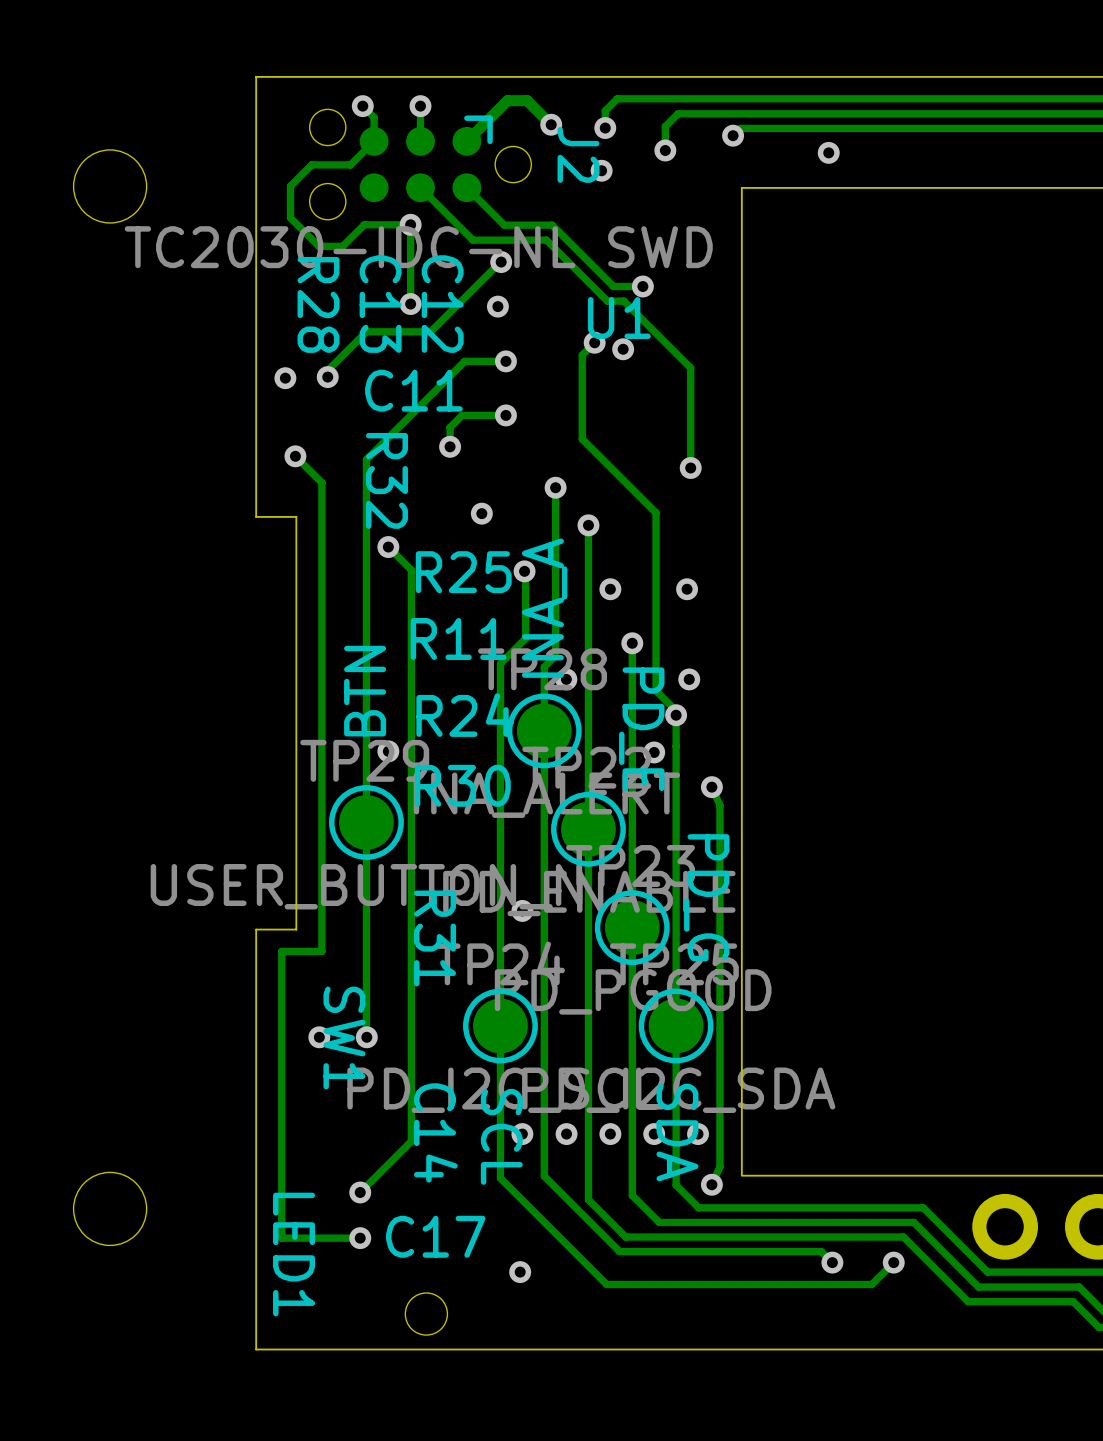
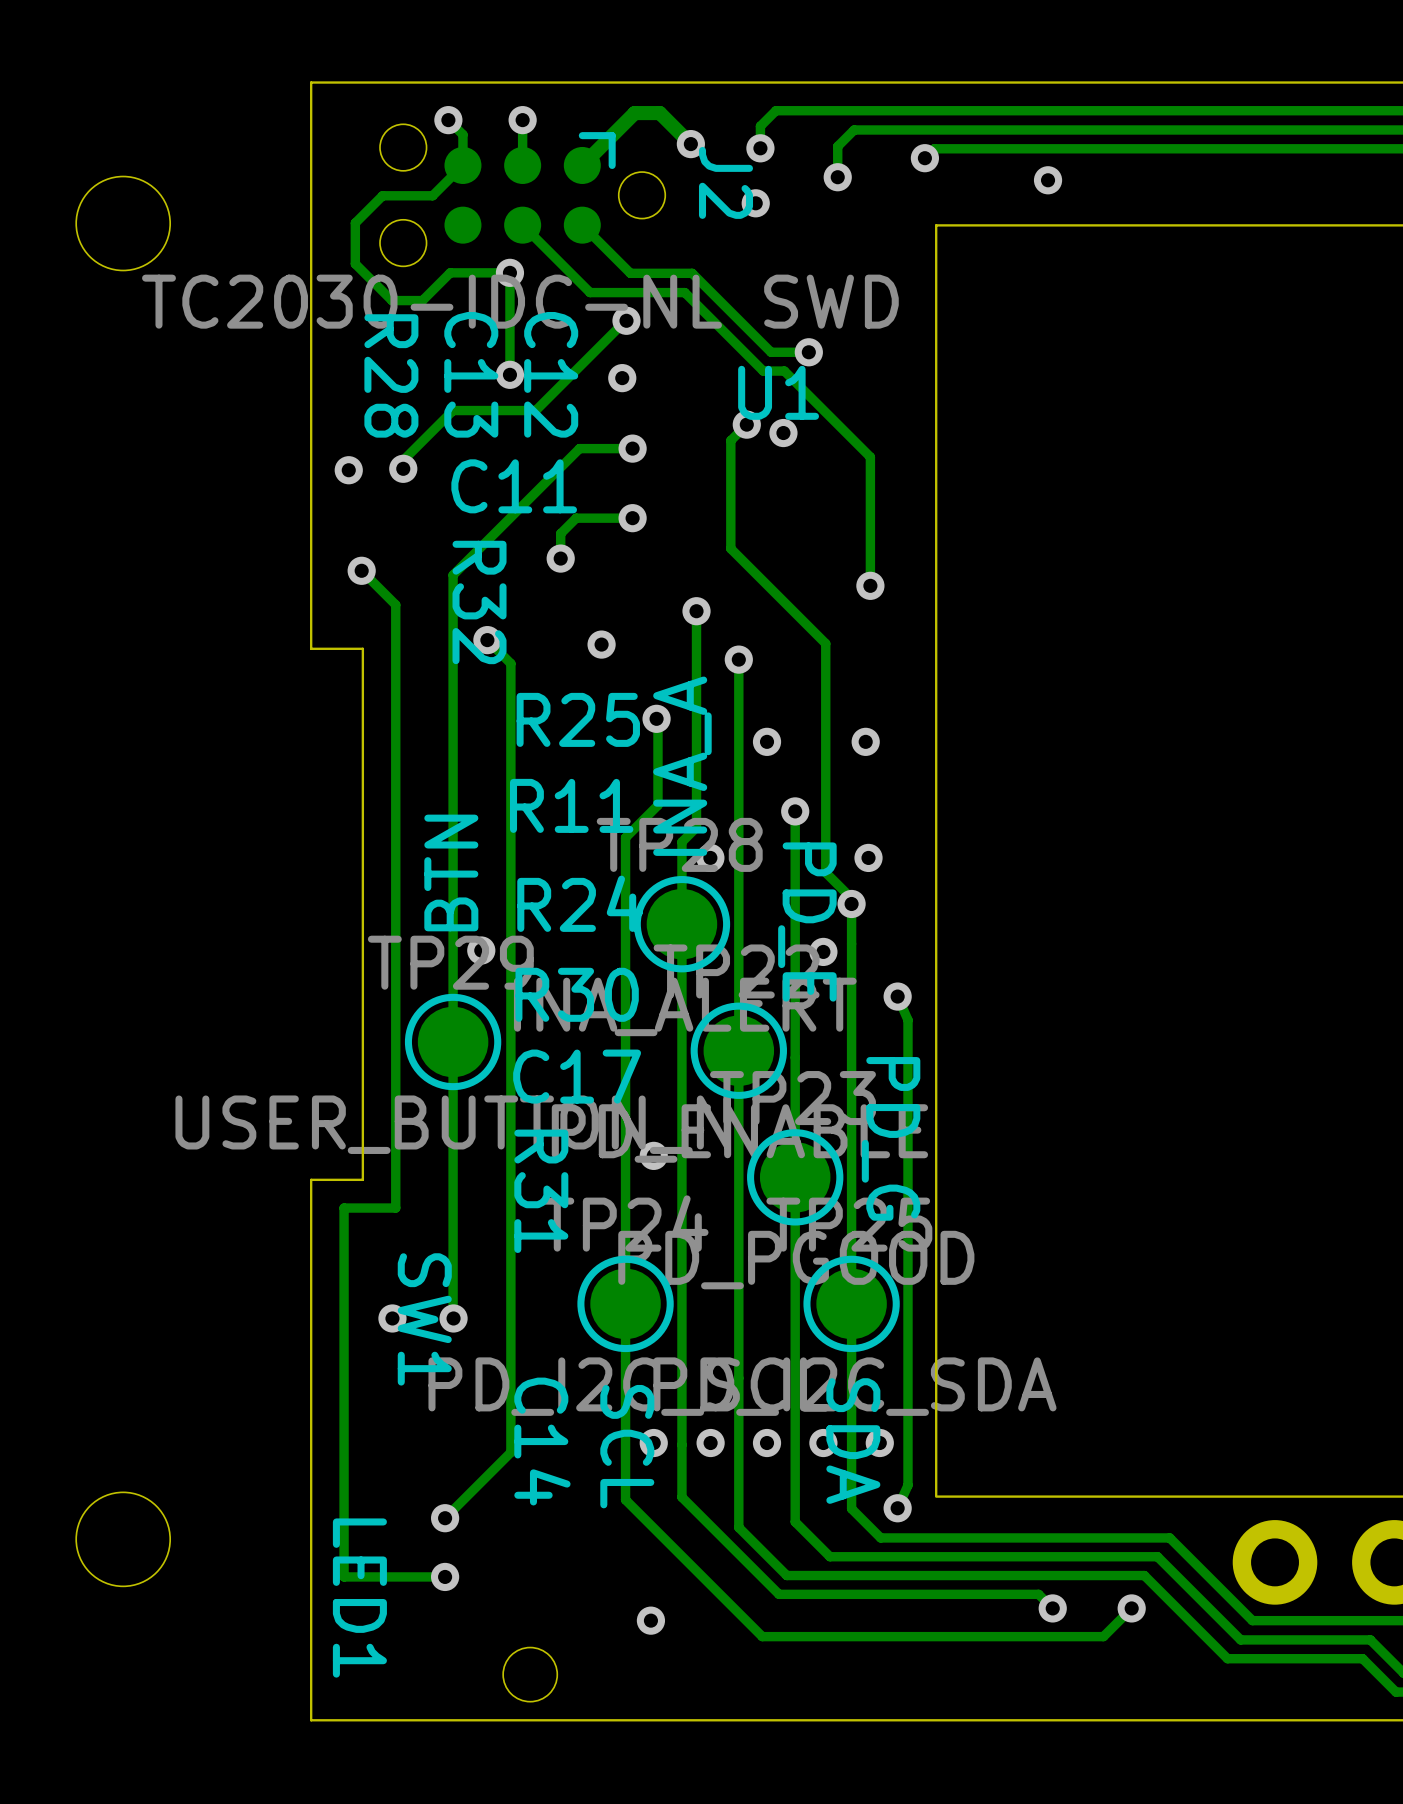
track: (388, 547) (411, 570) -> (487, 640) (510, 663) (510, 717)
via position: (388, 547) -> (487, 640)
C17 position: (435, 1236) -> (577, 1076)

